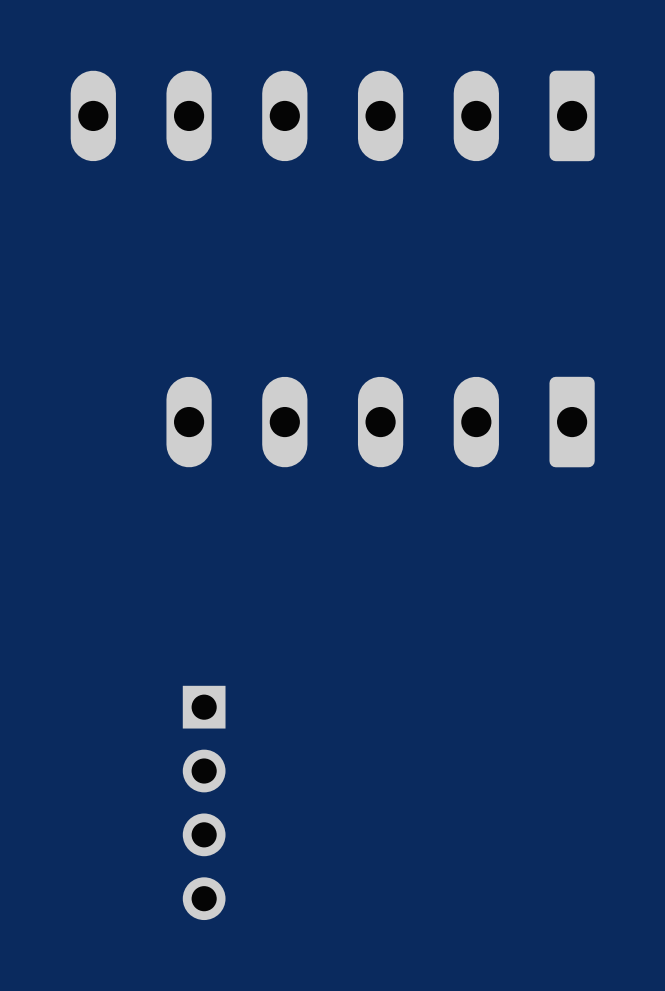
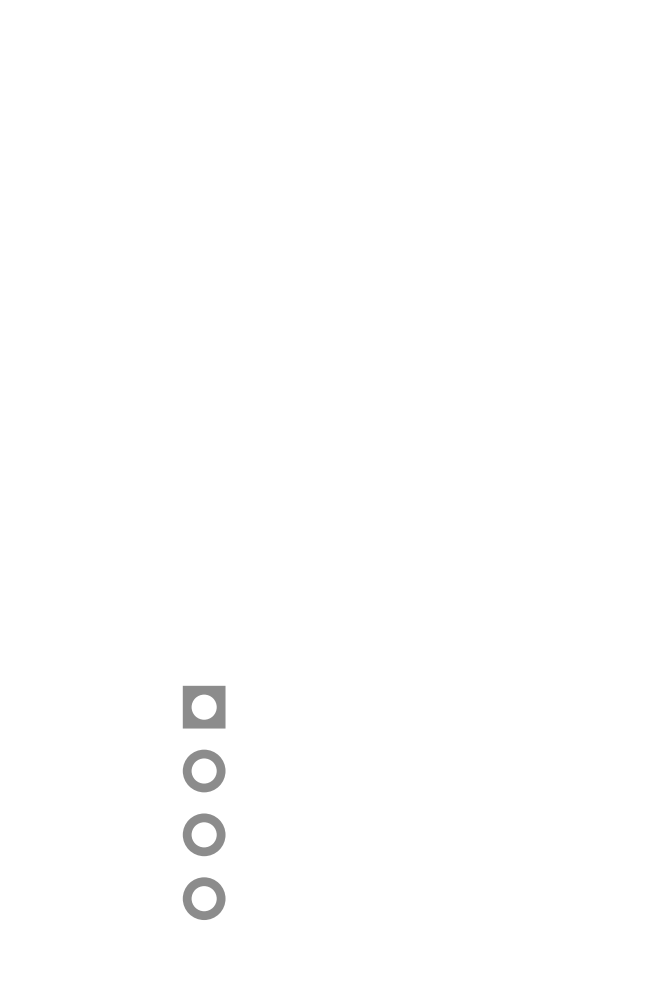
part: (332, 115) -> none
part: (380, 422) -> none

